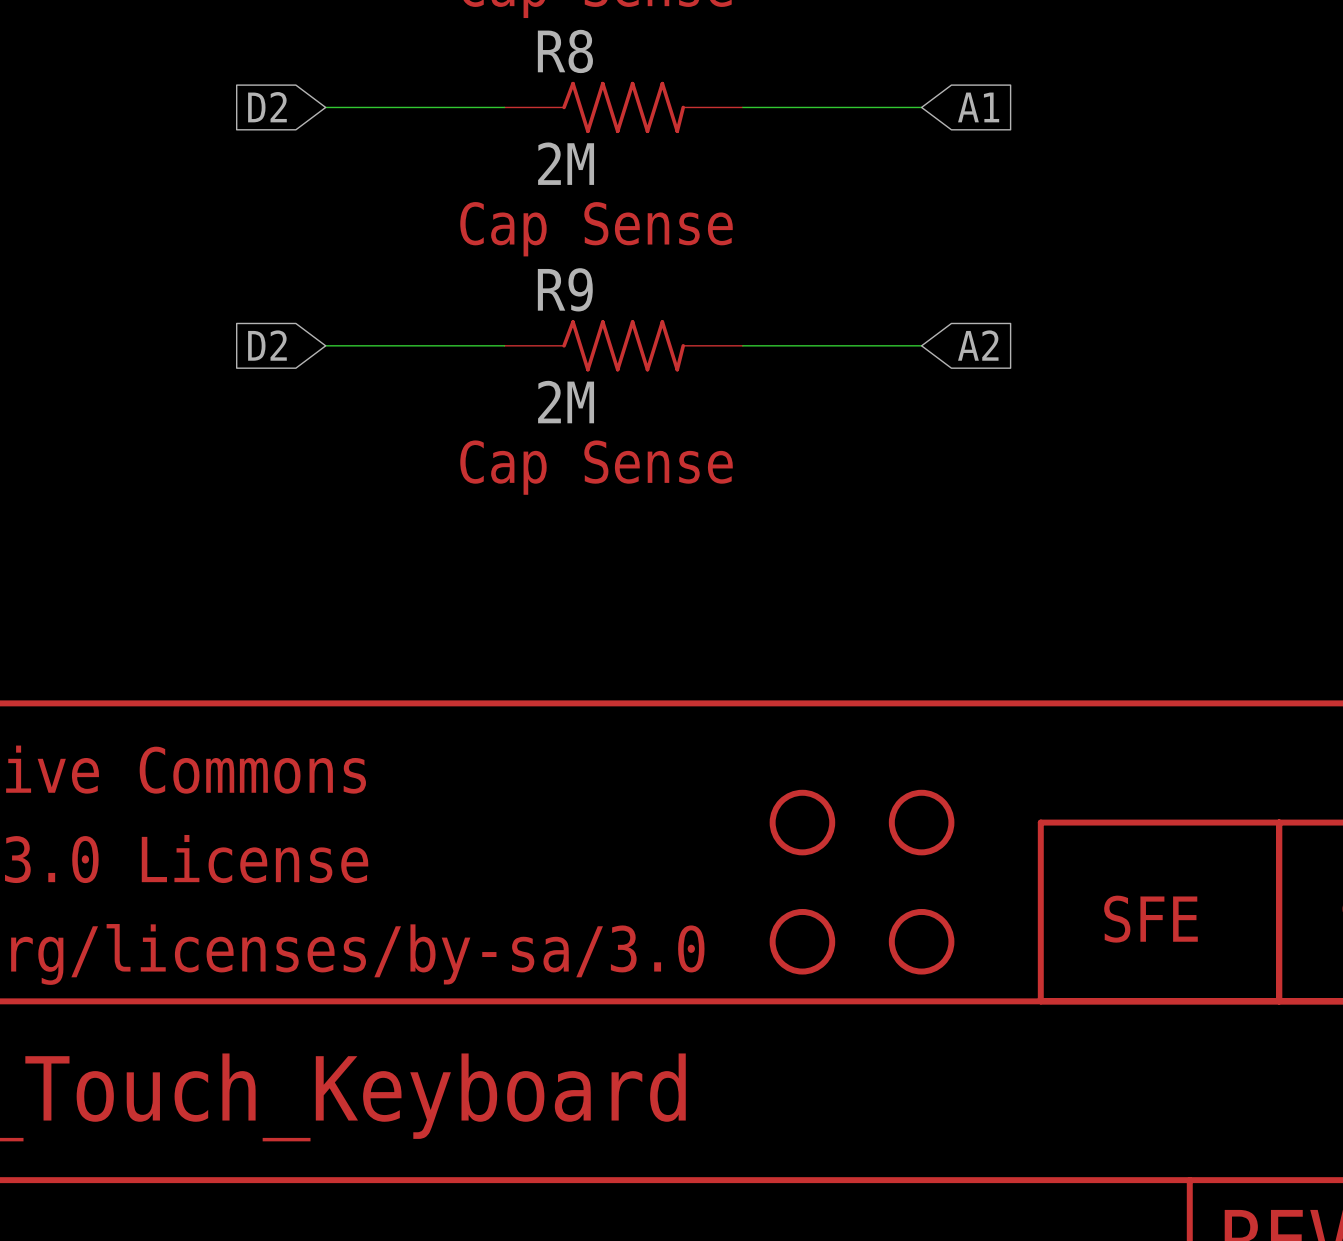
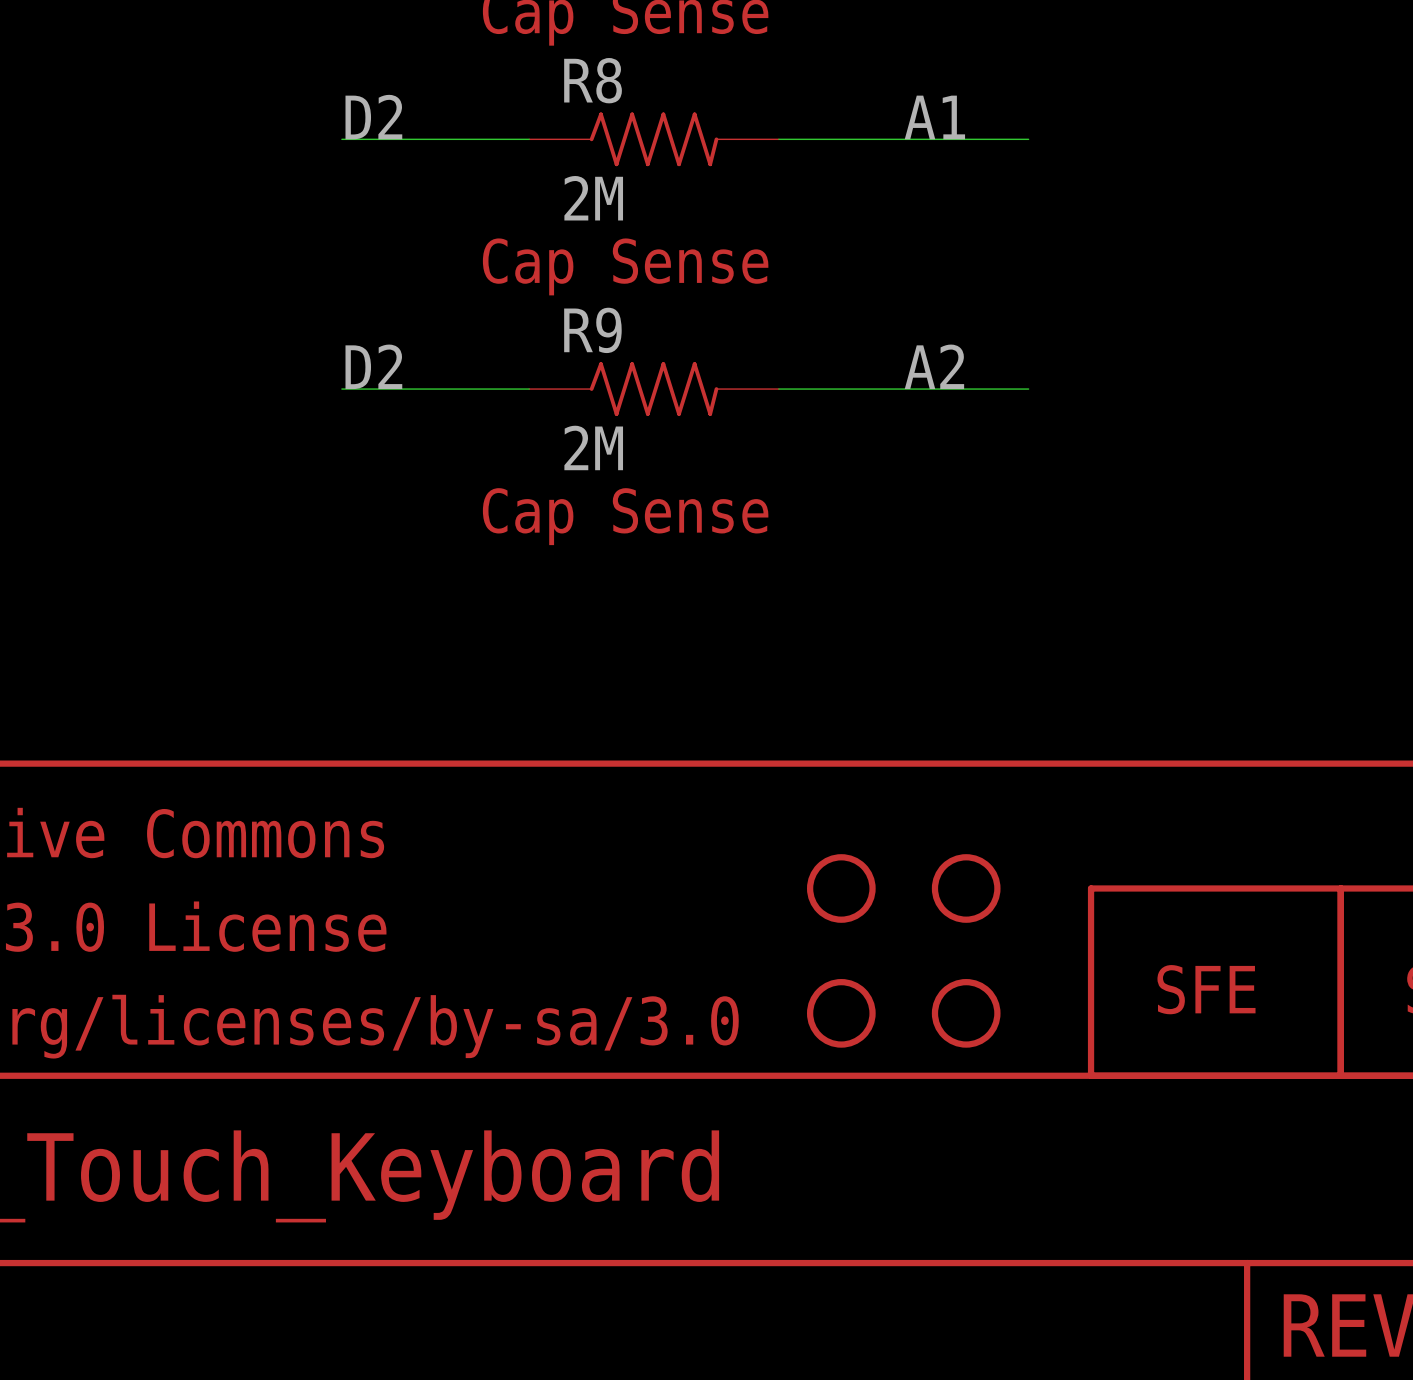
label: none -> D2 (373, 117)
label: none -> A1 (934, 117)
global label: D2 (267, 107) -> none
wire: none -> (966, 139) (1028, 139)
global label: A1 (978, 107) -> none
label: none -> D2 (373, 366)
label: none -> A2 (934, 366)
global label: D2 (267, 345) -> none
wire: none -> (966, 389) (1028, 389)
global label: A2 (978, 345) -> none

